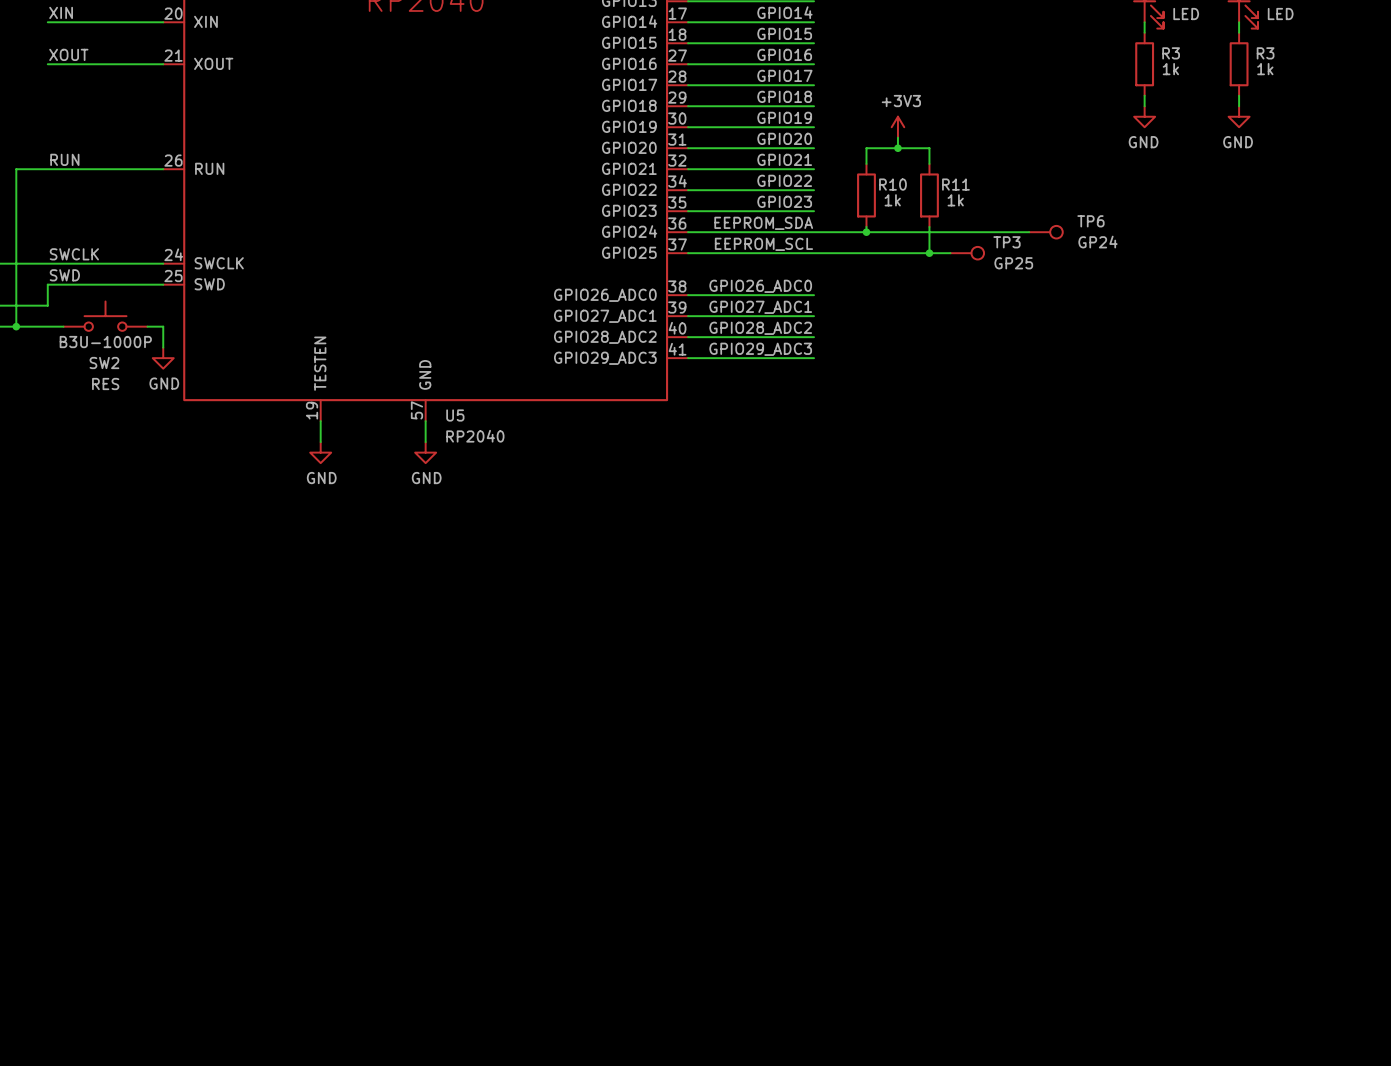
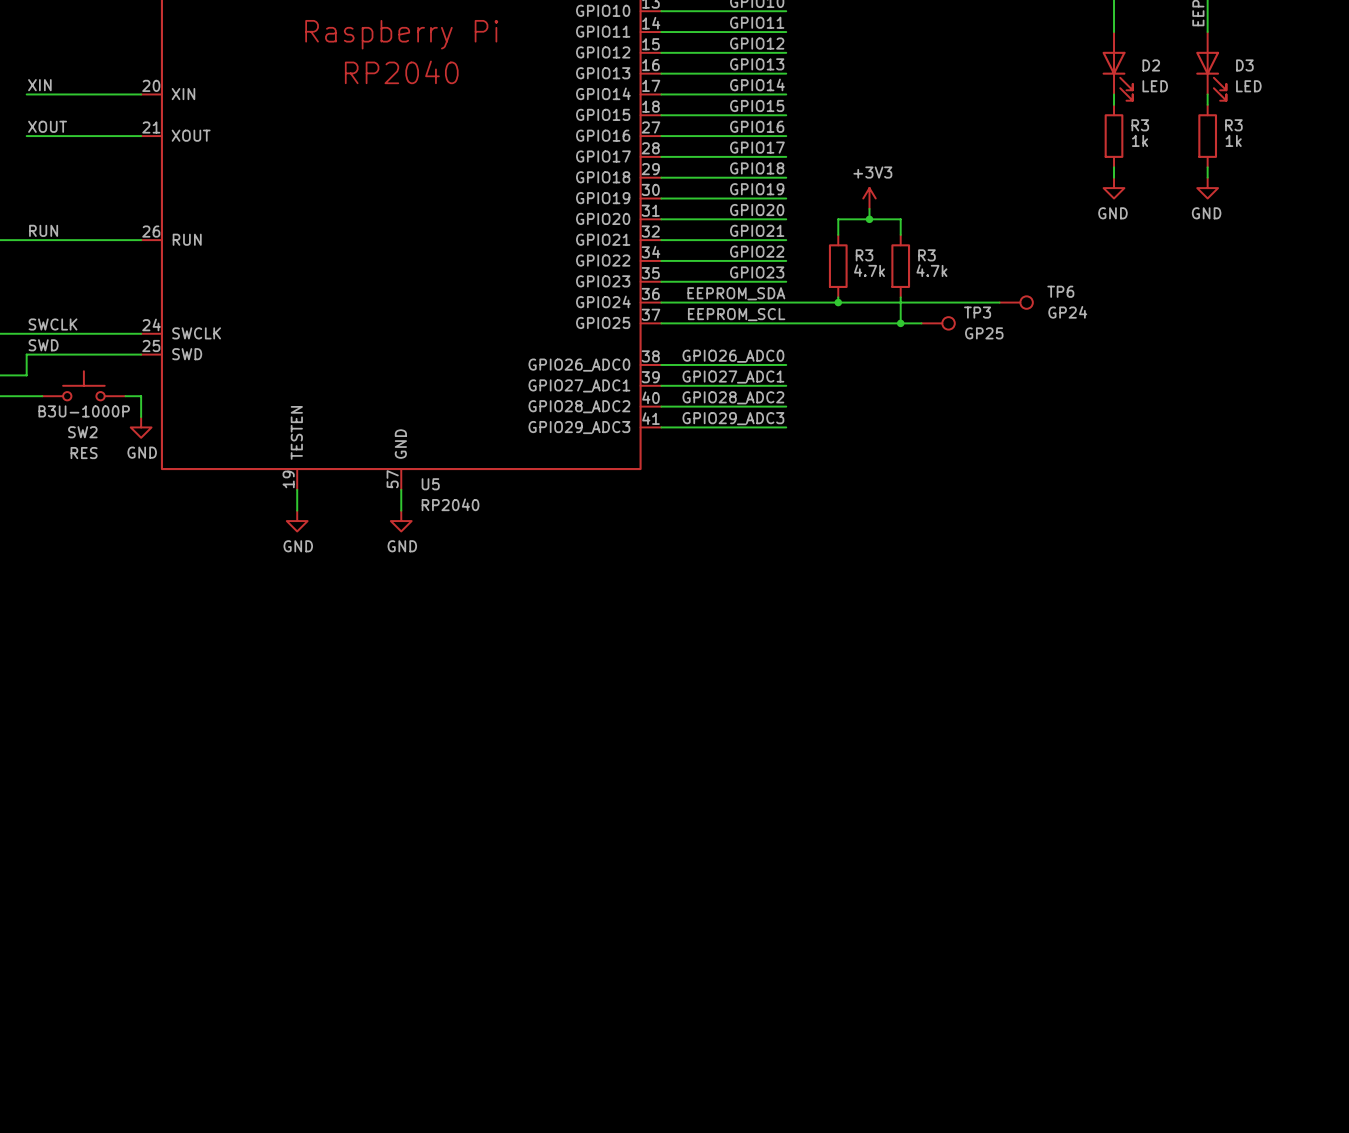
R10 name: R10 (892, 184) -> R3 (864, 255)
R11 name: R11 (955, 184) -> R3 (926, 255)
R10 value: 1k (892, 200) -> 4.7k (869, 270)
R11 value: 1k (955, 200) -> 4.7k (931, 270)

